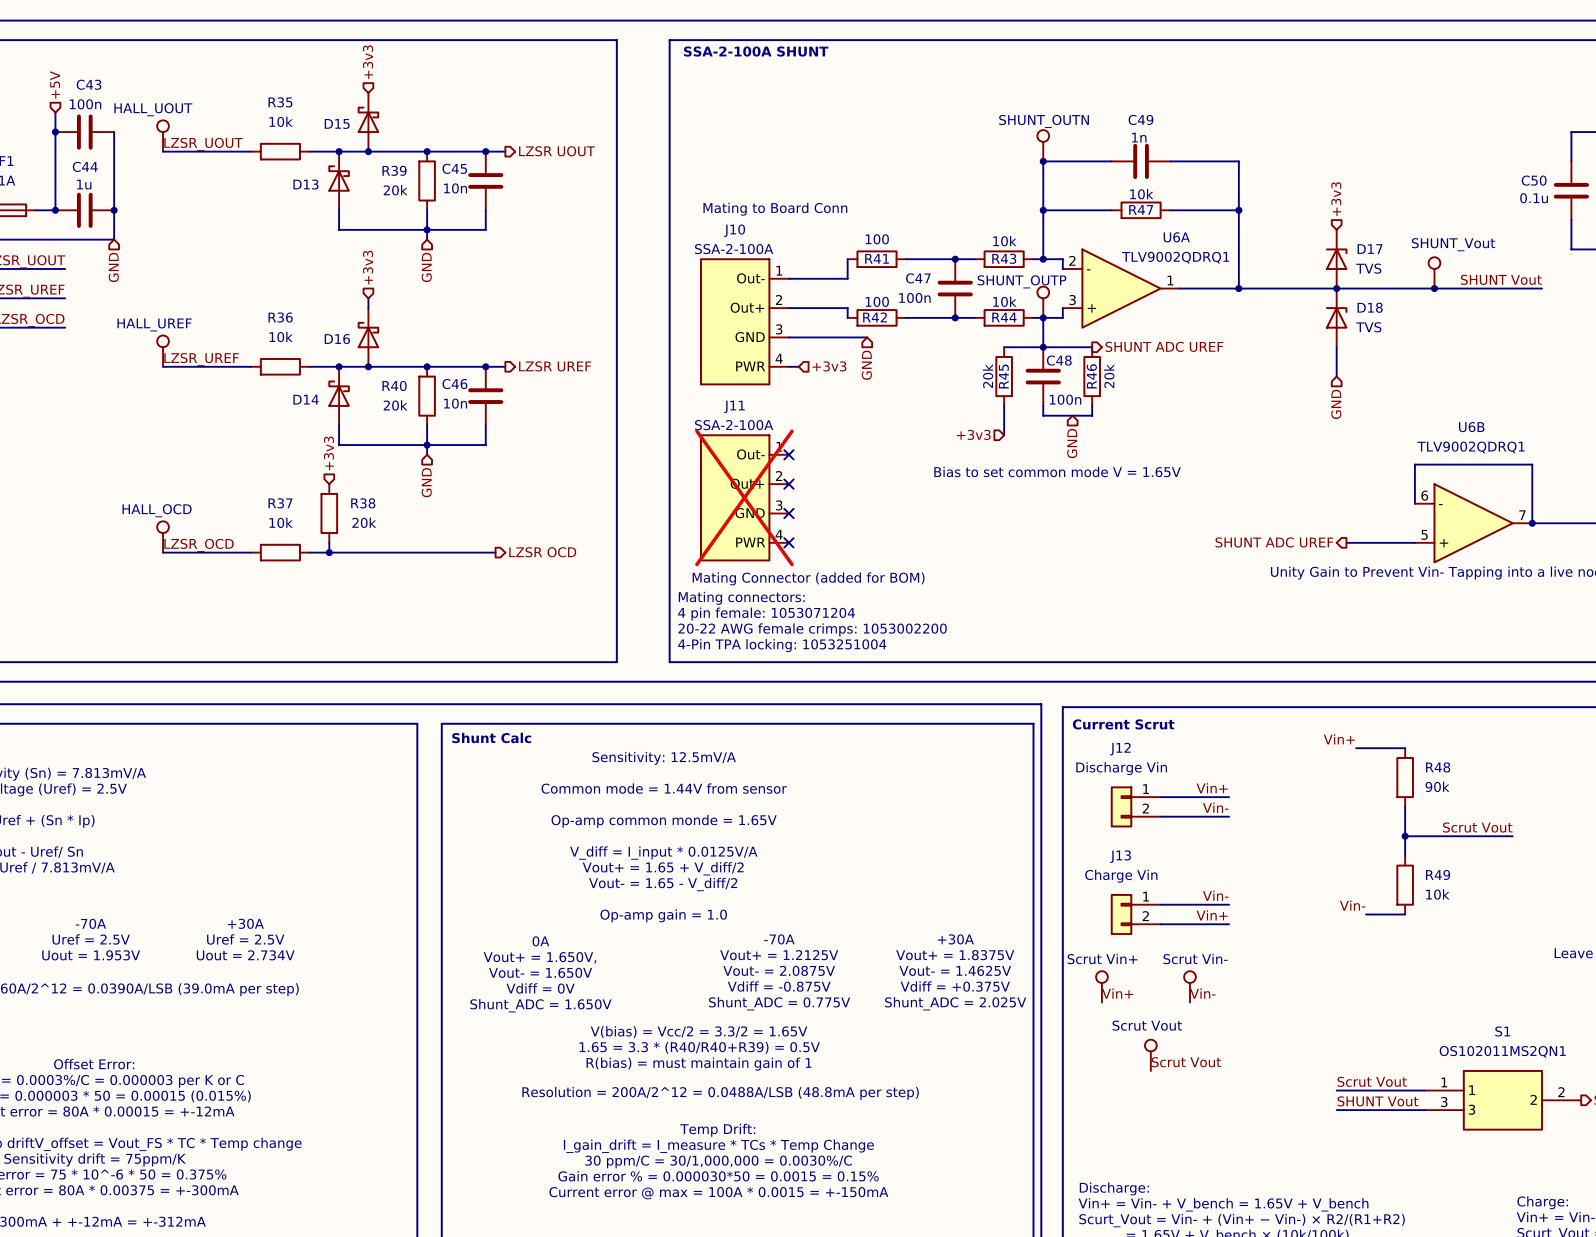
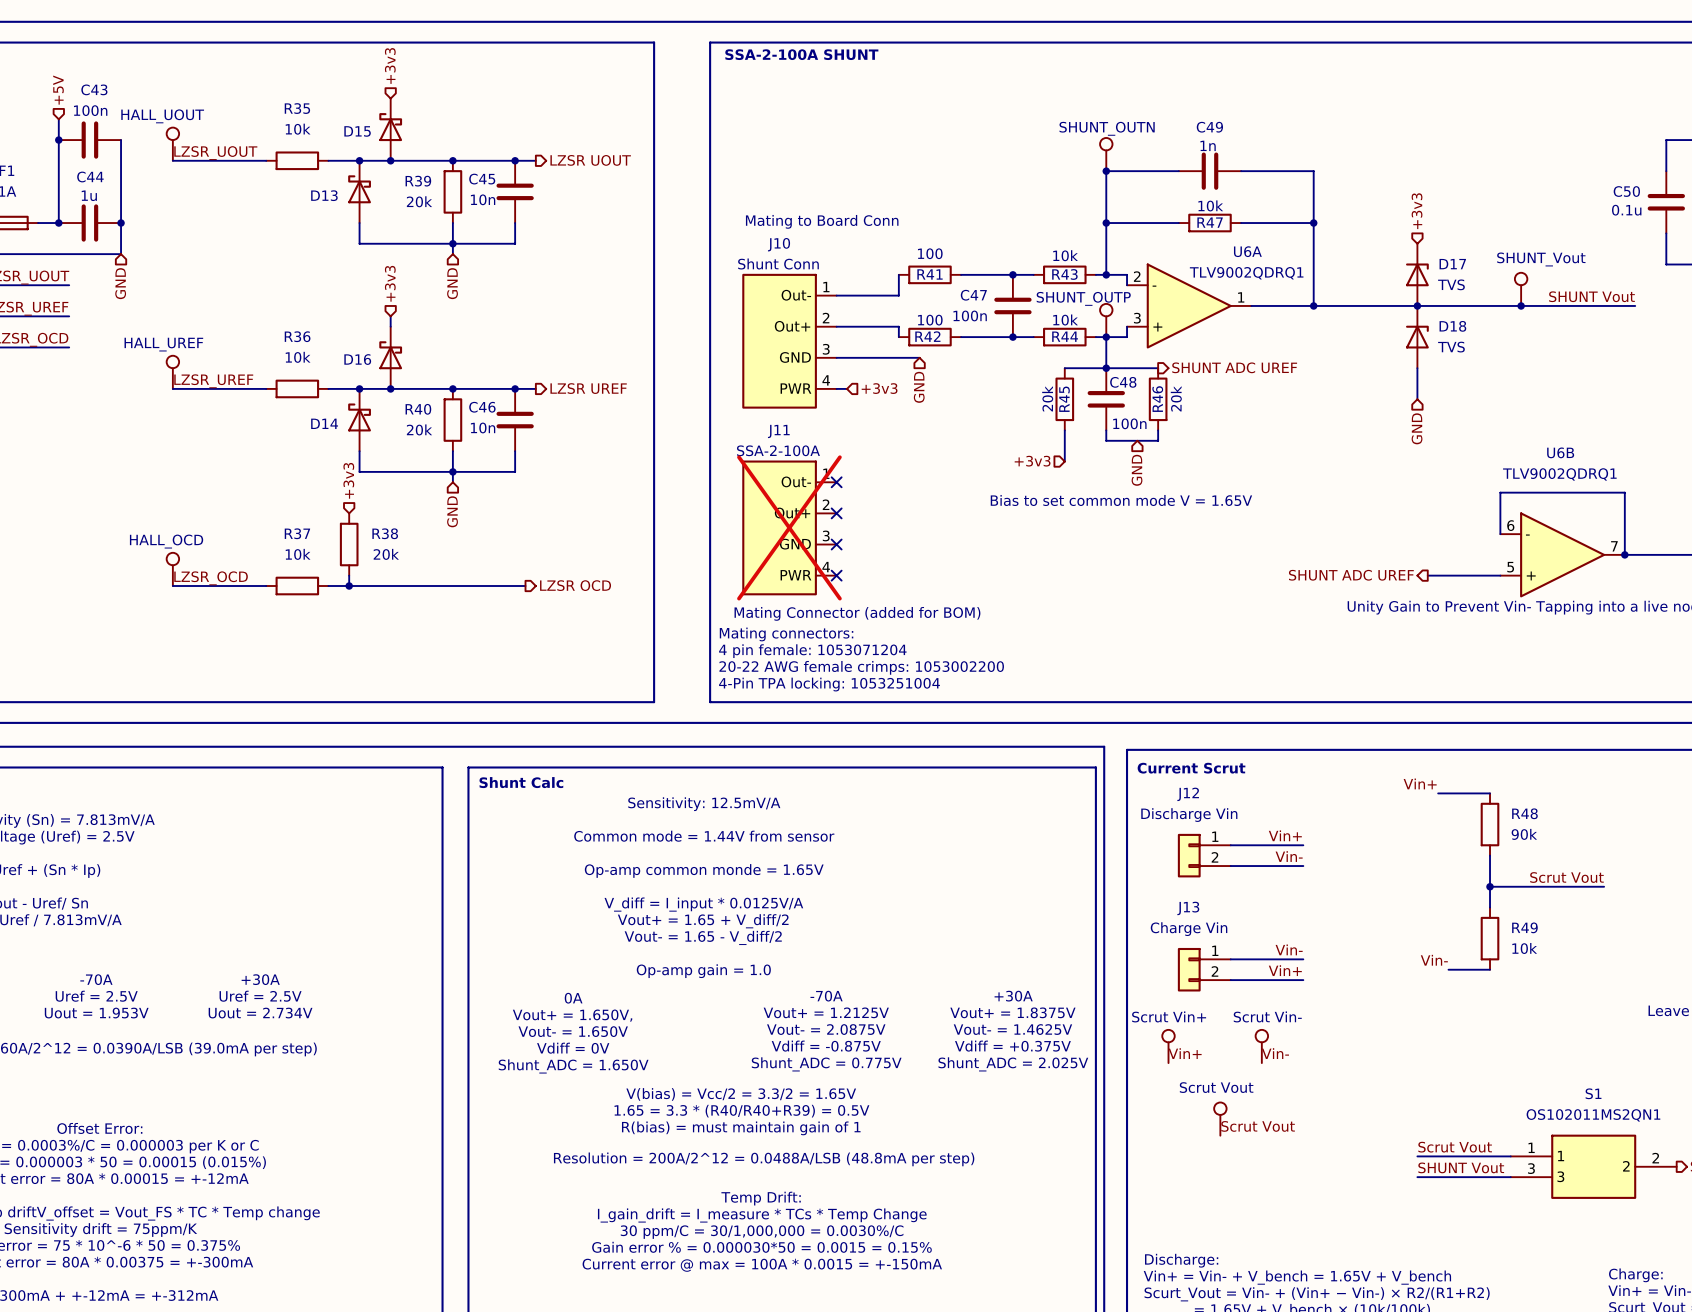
J10 value: SSA-2-100A (734, 249) -> Shunt Conn (778, 263)

